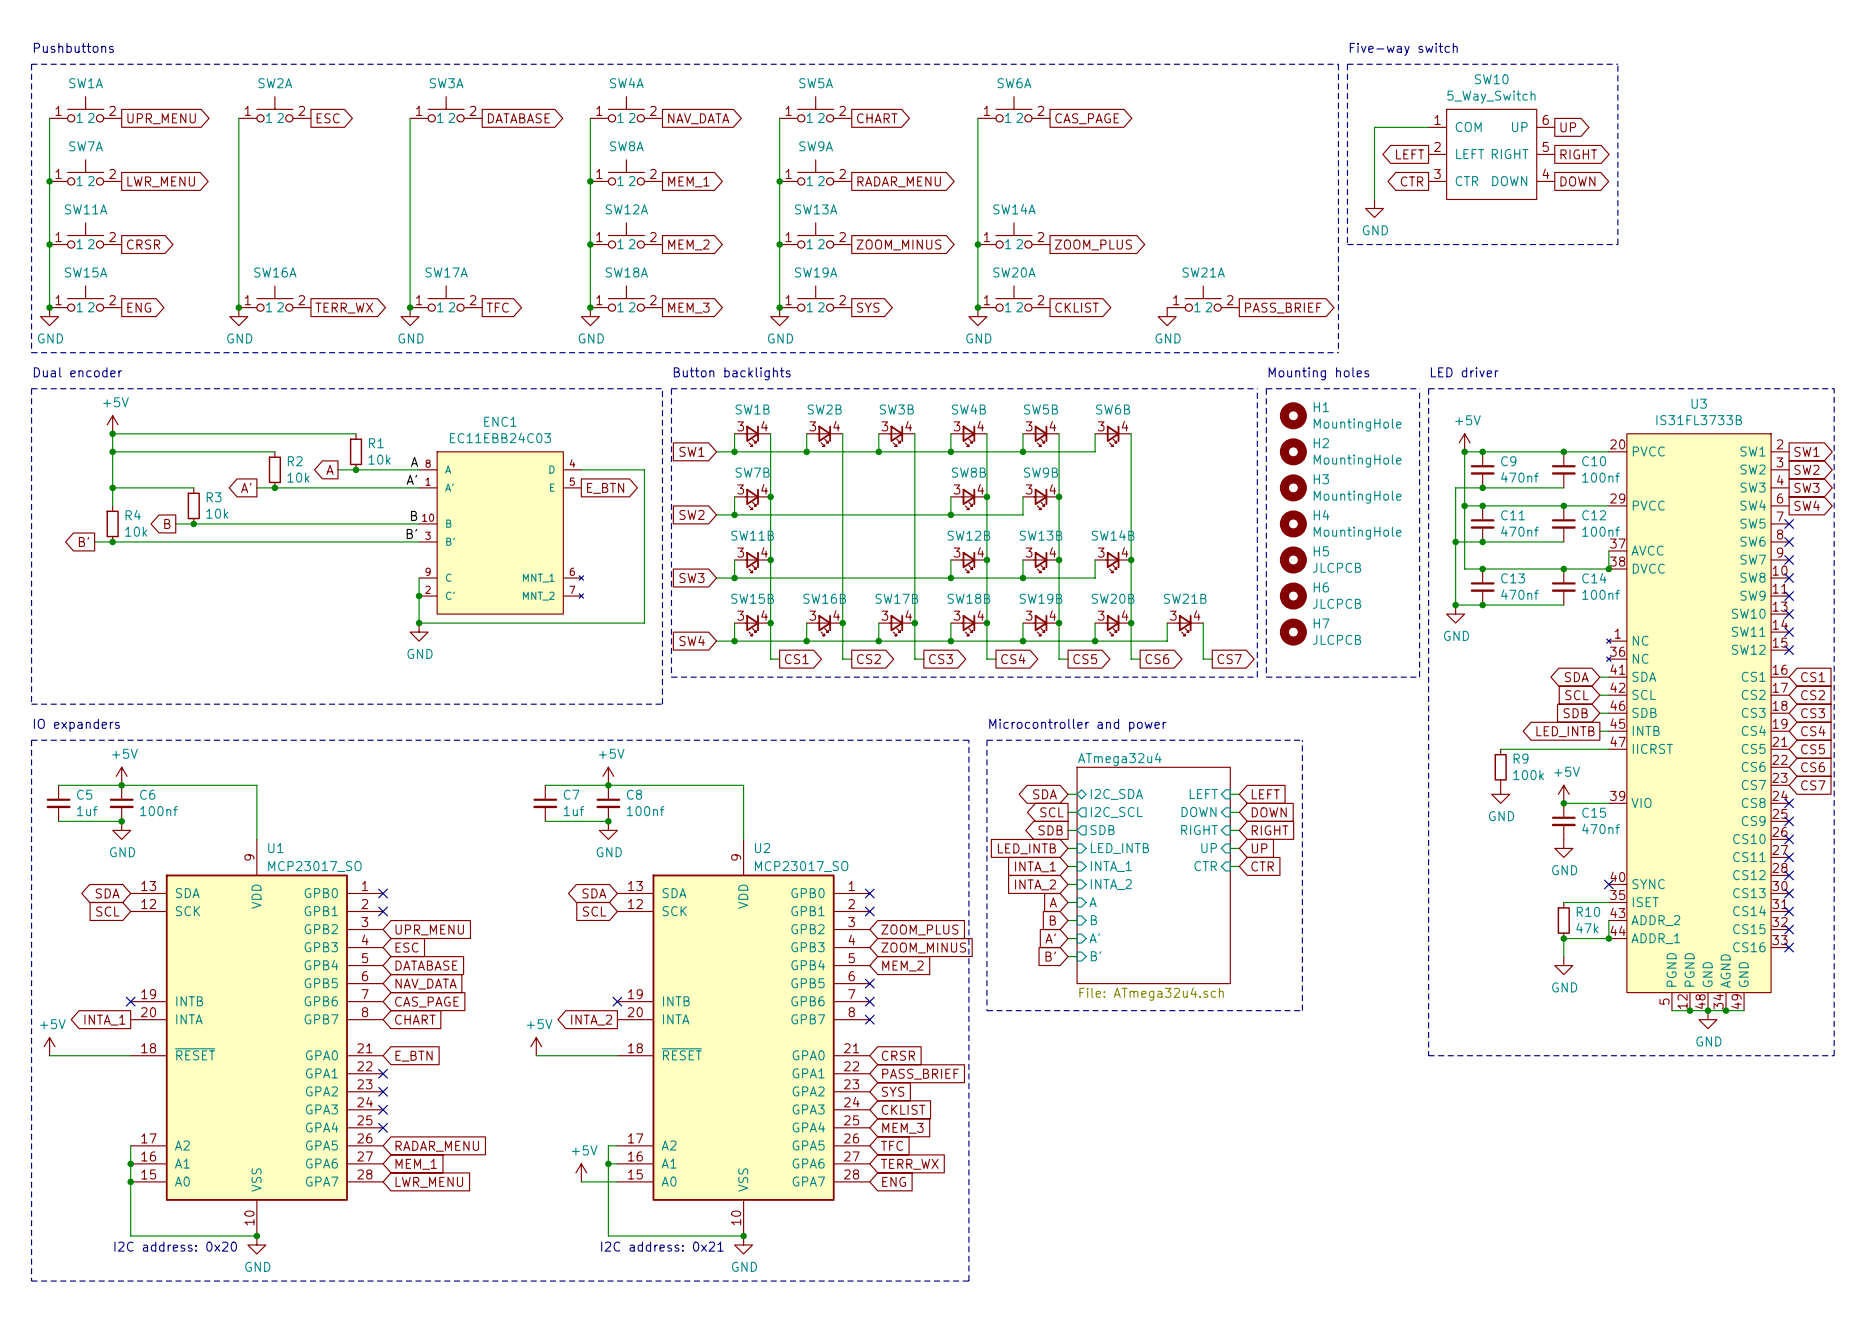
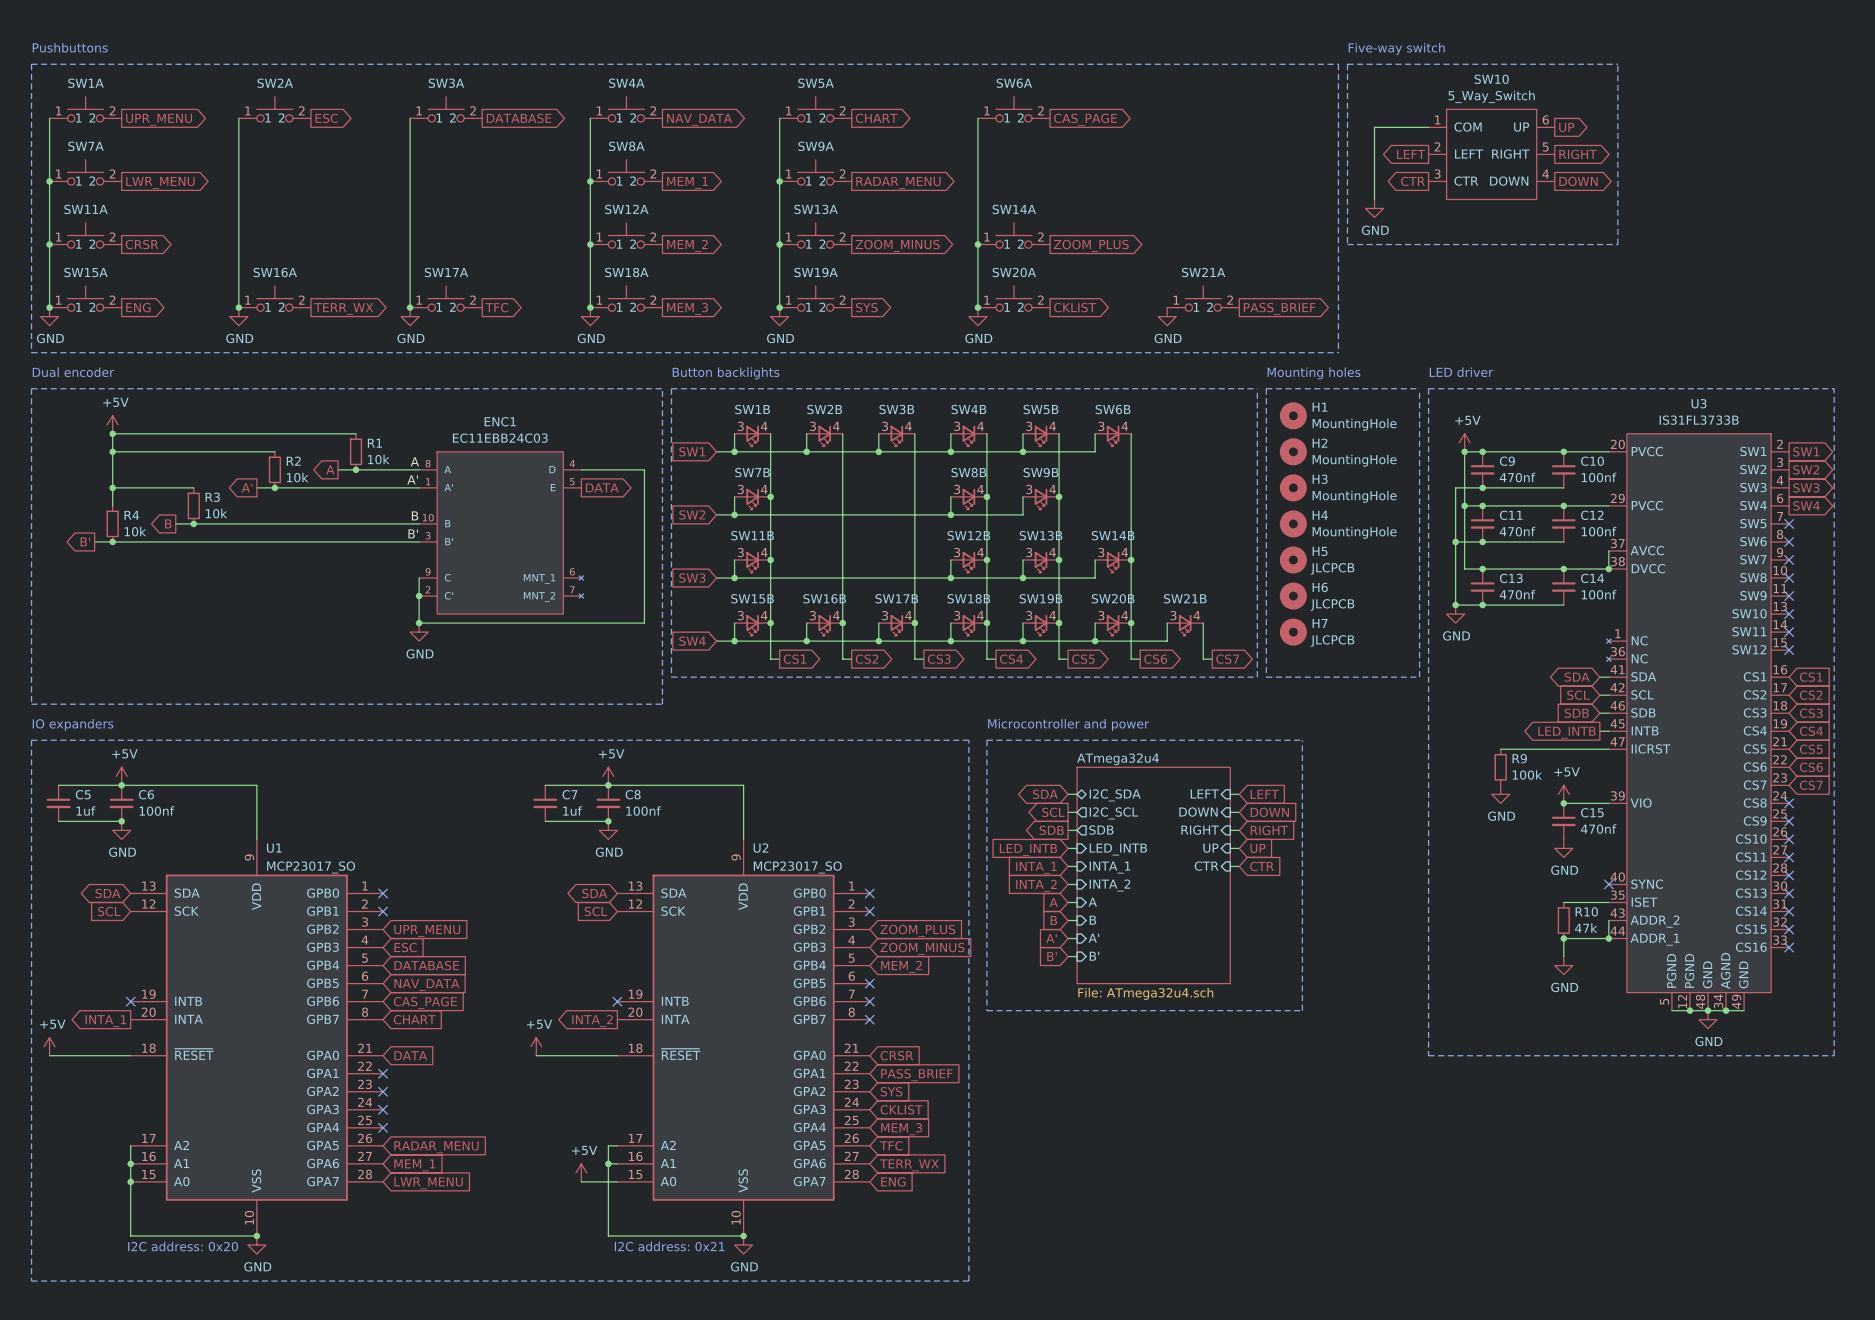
global label: E_BTN (605, 488) -> DATA (602, 487)
global label: E_BTN (414, 1056) -> DATA (410, 1055)

